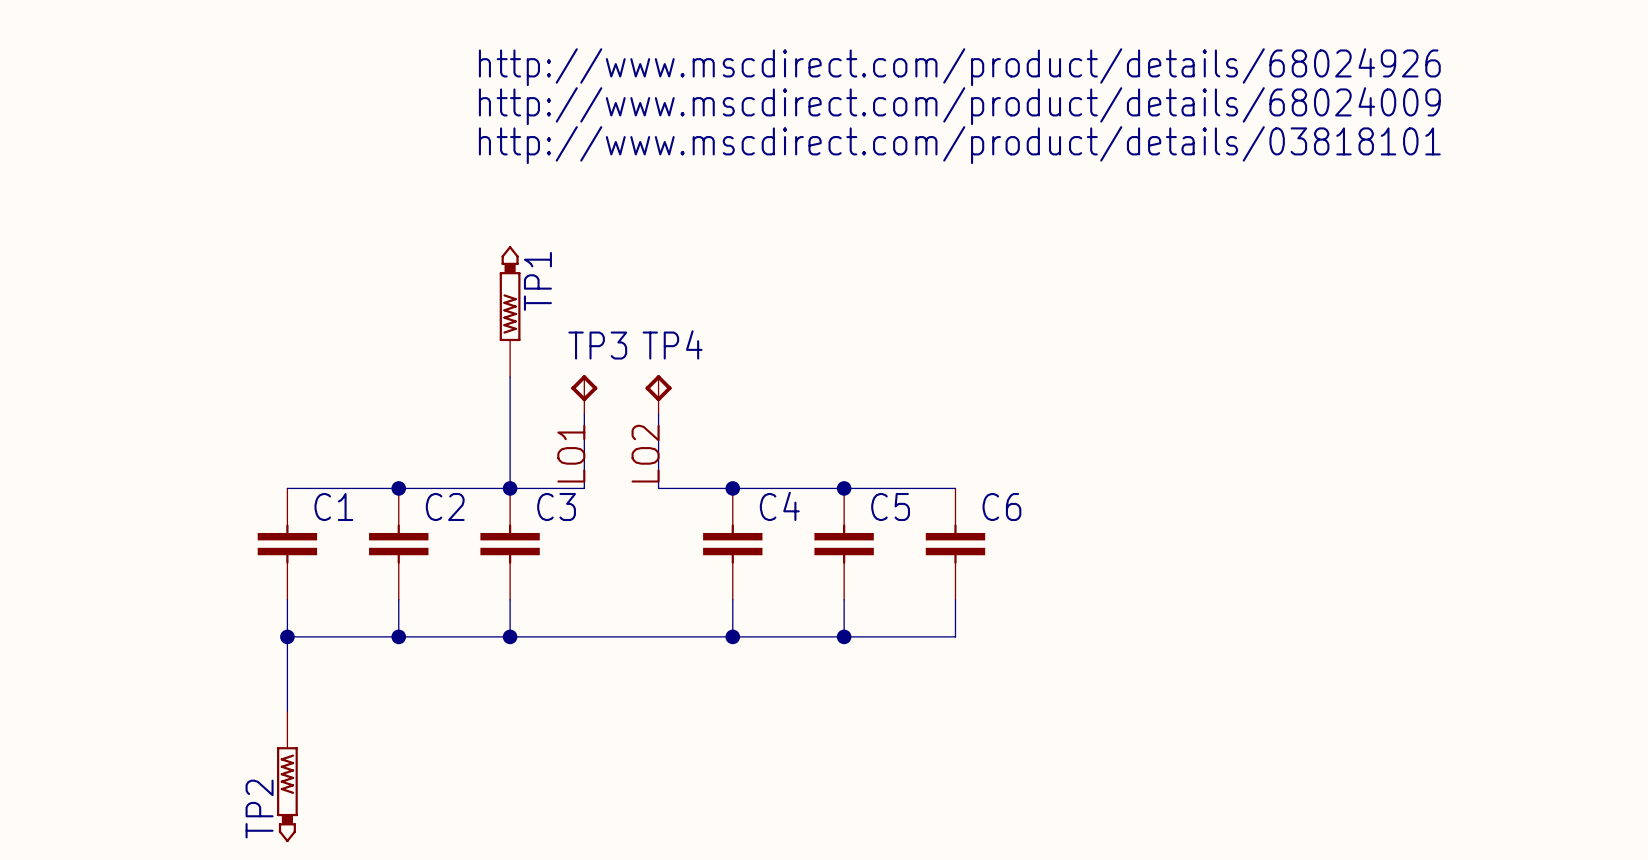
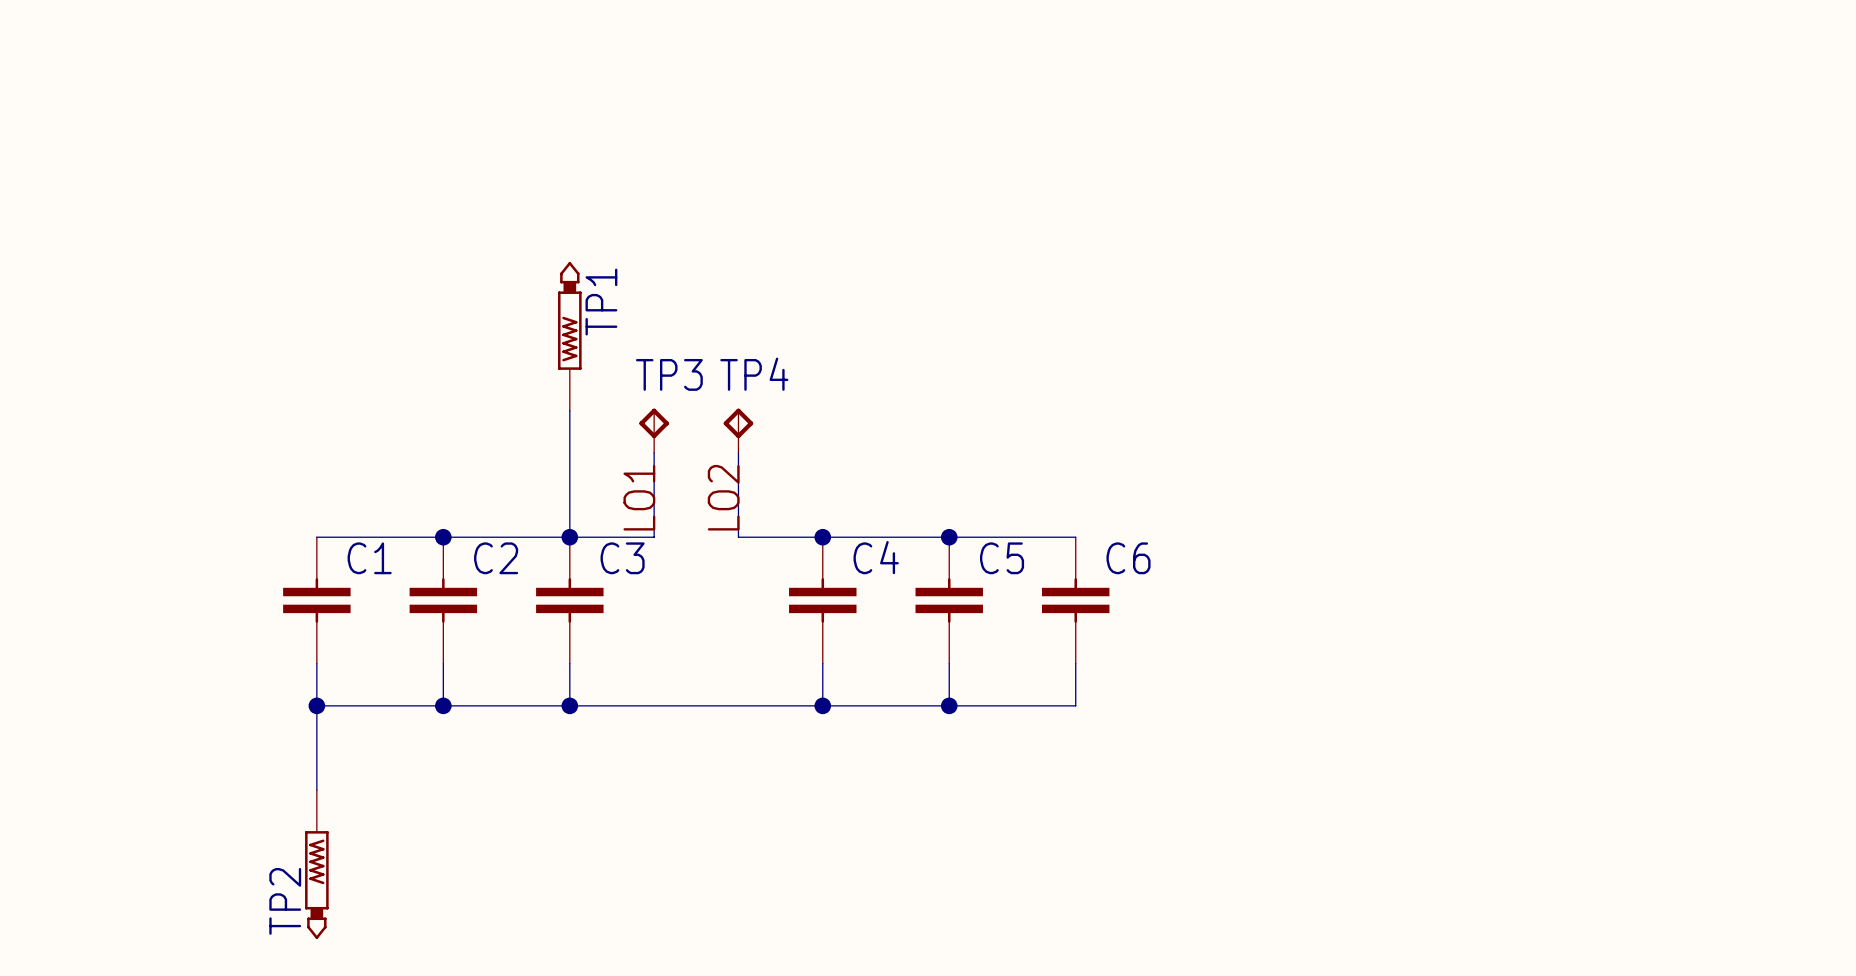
text: http://www.mscdirect.com/product/details/68024926 (959, 67) -> none
text: http://www.mscdirect.com/product/details/68024009 (959, 106) -> none
text: http://www.mscdirect.com/product/details/03818101 (959, 145) -> none

